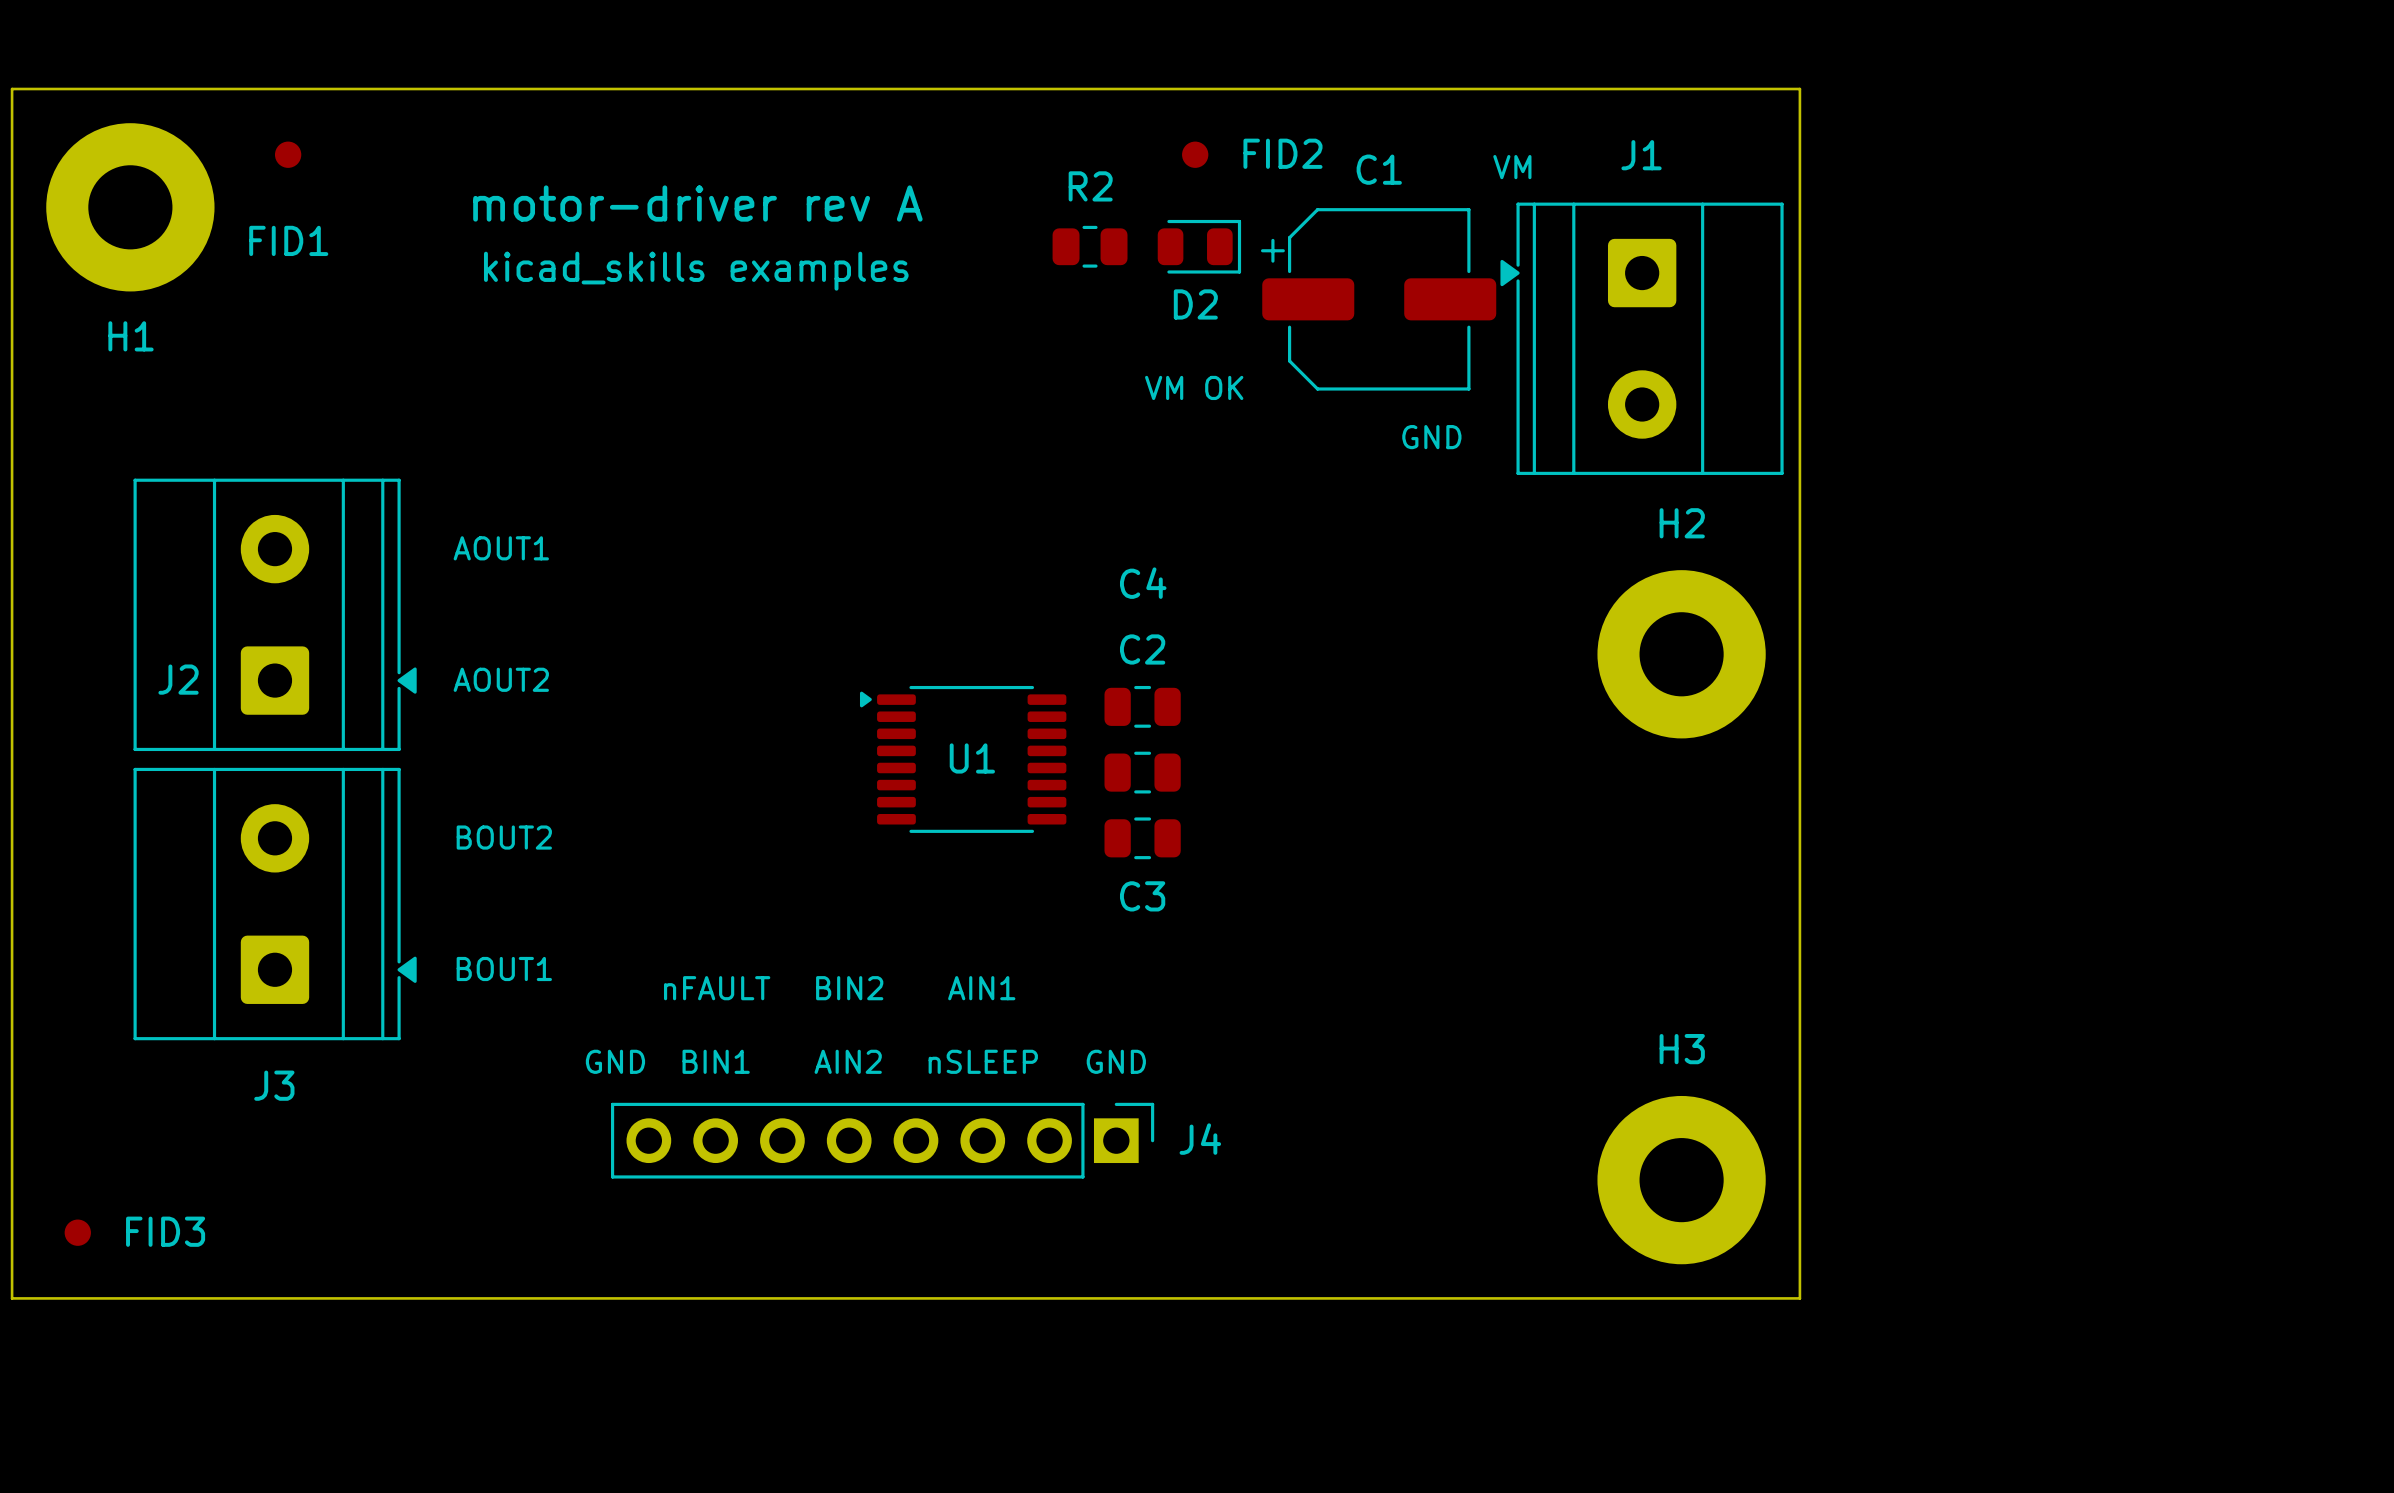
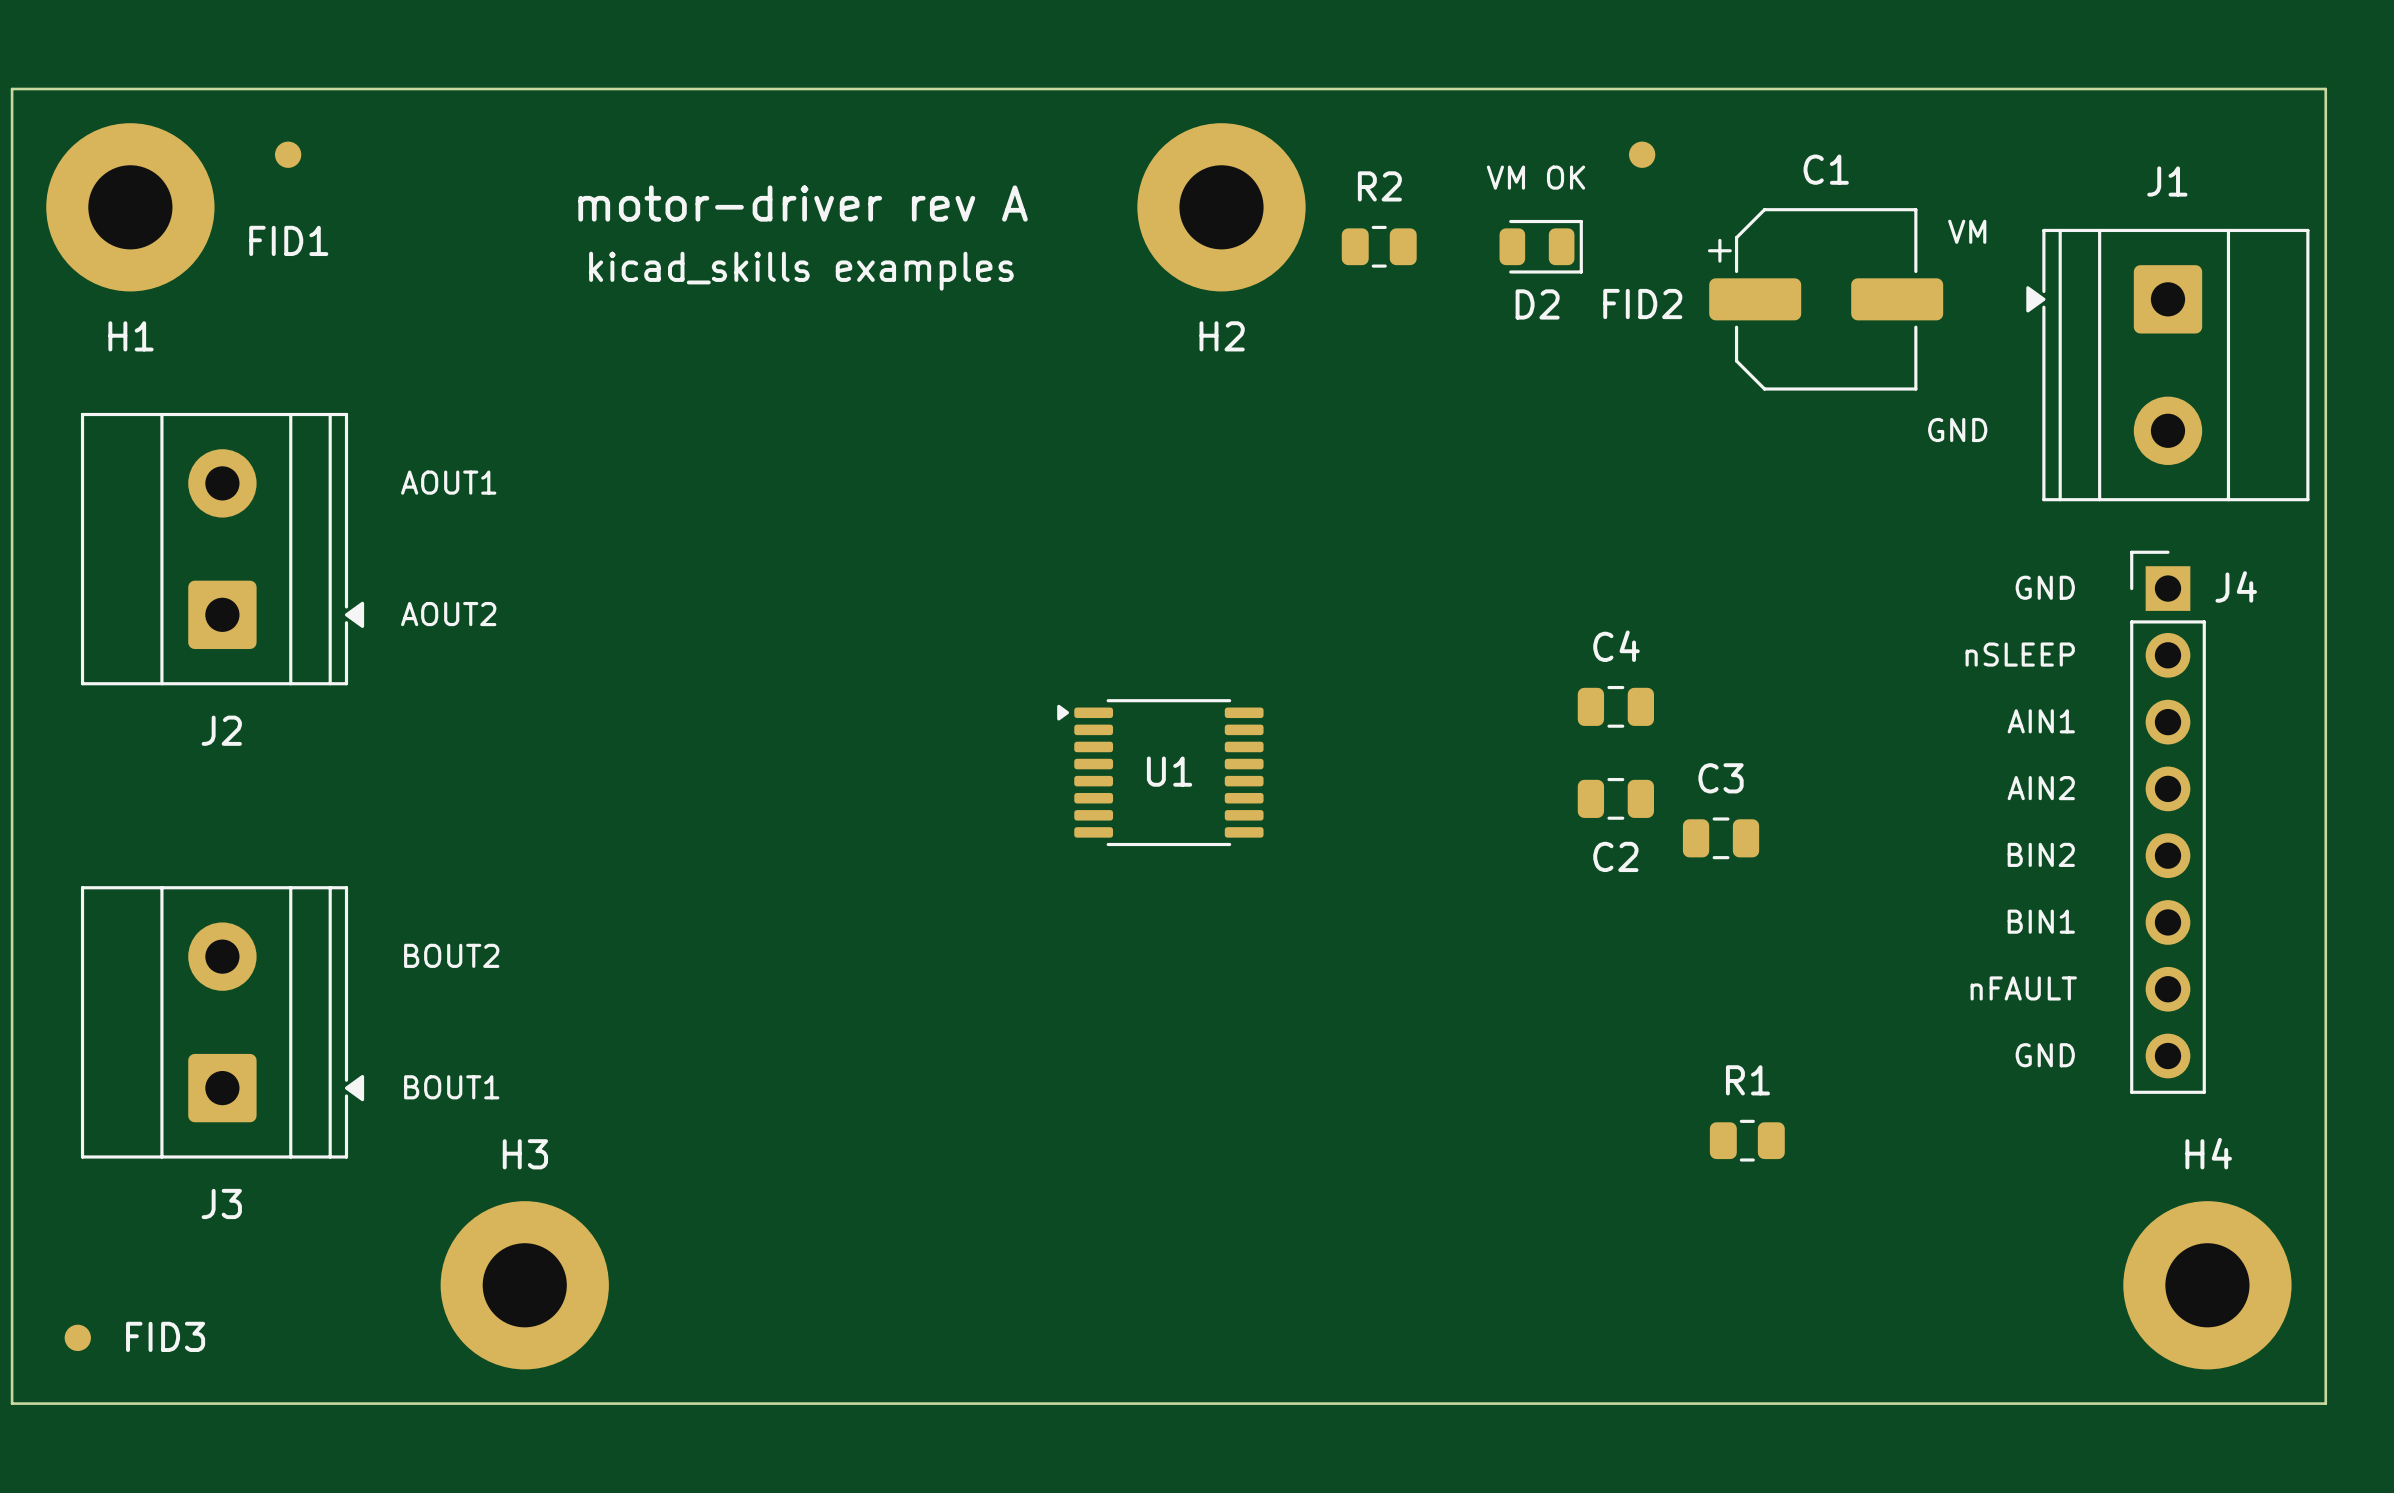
board edge: (1799, 89) (1799, 1298) (12, 1298) -> (1799, 89) (2325, 89) (2325, 1403) (12, 1403) (12, 1298)
FID2 name position: FID2 (1282, 153) -> FID2 (1642, 304)
FID2 position: (1195, 154) -> (1642, 154)
text position: VM (1512, 167) -> VM (1967, 231)
text position: motor-driver rev A (697, 203) -> motor-driver rev A (803, 203)
R2 position: (1090, 246) -> (1379, 246)
D2 position: (1199, 246) -> (1541, 246)
text position: kicad_skills examples (696, 271) -> kicad_skills examples (801, 271)
C1 position: (1378, 299) -> (1825, 299)
J1 position: (1642, 338) -> (2167, 365)
text position: VM OK (1194, 387) -> VM OK (1535, 177)
text: none -> GND (1957, 430)
text: GND (1431, 437) -> none
H2 name position: H2 (1682, 523) -> H2 (1222, 336)
text position: AOUT1 (501, 548) -> AOUT1 (448, 482)
C4 name position: C4 (1143, 583) -> C4 (1616, 646)
text: none -> GND (2045, 587)
J2 position: (275, 614) -> (222, 549)
C2 name position: C2 (1142, 649) -> C2 (1615, 856)
H2 position: (1681, 654) -> (1221, 207)
text: none -> nSLEEP (2020, 654)
J2 name position: J2 (178, 679) -> J2 (221, 730)
text position: AOUT2 (501, 679) -> AOUT2 (448, 614)
C4 position: (1142, 706) -> (1615, 706)
text: none -> AIN1 (2041, 721)
U1 position: (963, 759) -> (1160, 772)
C2 position: (1142, 772) -> (1615, 798)
text: none -> AIN2 (2041, 788)
text position: BOUT2 (504, 837) -> BOUT2 (451, 955)
C3 position: (1142, 838) -> (1721, 838)
text: none -> BIN2 (2041, 854)
C3 name position: C3 (1142, 896) -> C3 (1721, 778)
J3 position: (275, 904) -> (222, 1022)
text: none -> BIN1 (2041, 921)
text position: BOUT1 (504, 968) -> BOUT1 (451, 1087)
text: nFAULT (717, 988) -> none
text: BIN2 (849, 988) -> none
text: AIN1 (981, 988) -> none
text: none -> nFAULT (2023, 988)
text: none -> GND (2045, 1055)
text: GND (615, 1061) -> none
text: BIN1 (716, 1061) -> none
text: AIN2 (848, 1061) -> none
text: nSLEEP (983, 1061) -> none
text: GND (1116, 1061) -> none
J4 name position: J4 (1200, 1139) -> J4 (2236, 586)
J4 rotation: 0° (882, 1140) -> 90° counterclockwise (2167, 822)
J4 position: (882, 1140) -> (2167, 822)
R1: none -> (1747, 1140)
H3 position: (1681, 1180) -> (524, 1285)
FID3 position: (77, 1232) -> (77, 1337)
H4: none -> (2207, 1285)

